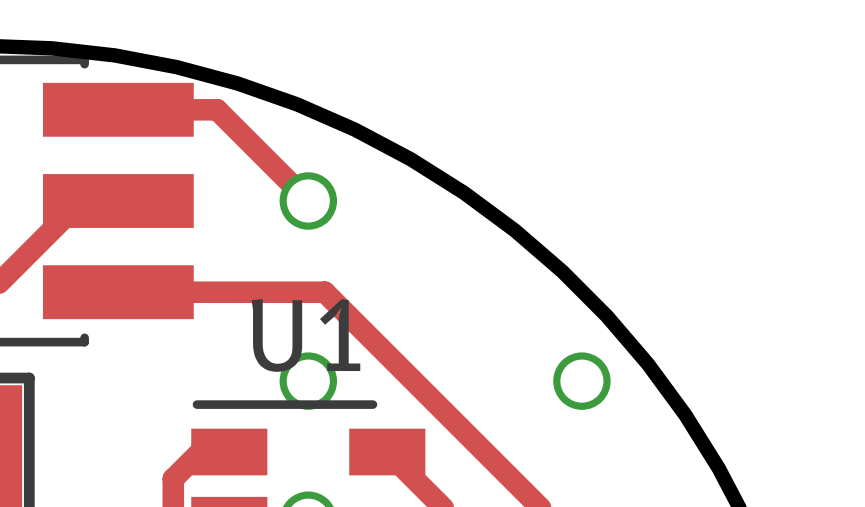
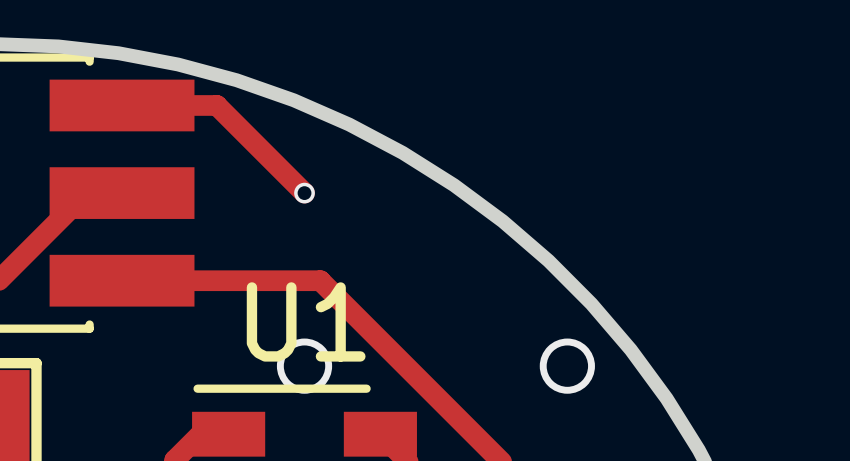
via size: [279, 172, 338, 230] -> [294, 182, 315, 204]

